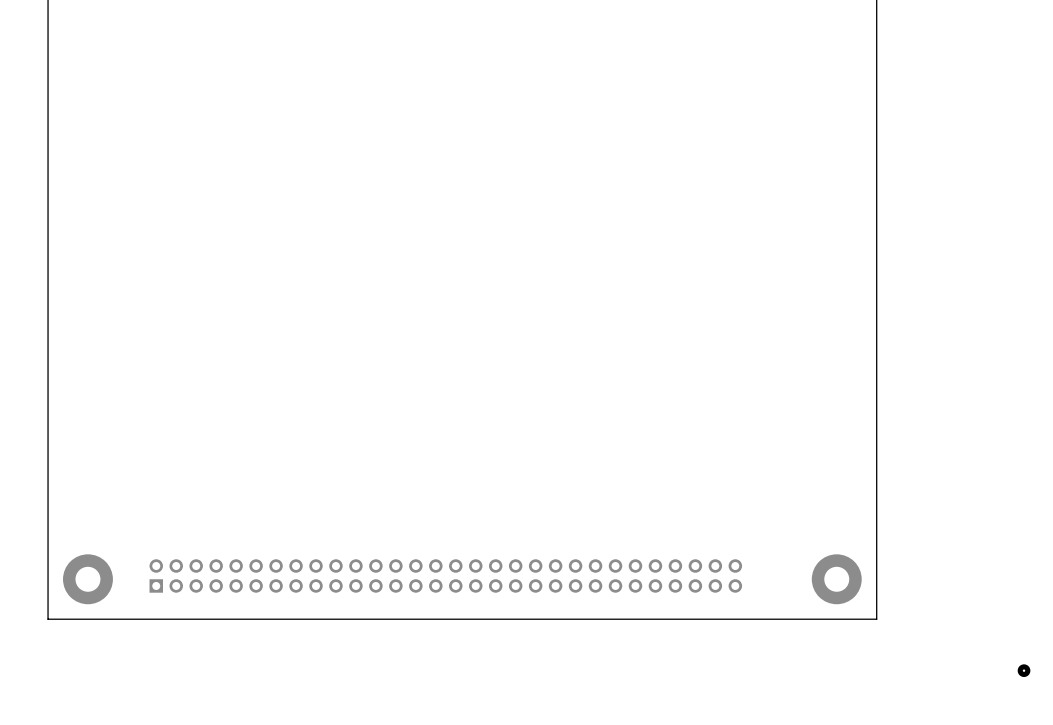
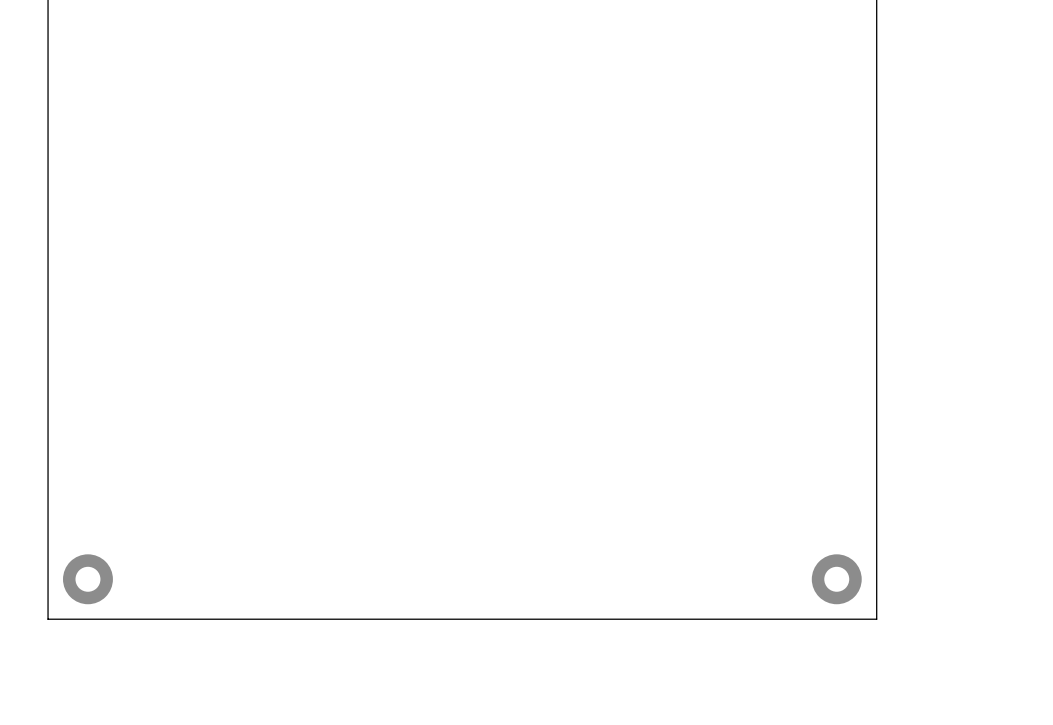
part: (445, 575) -> none
part: (1024, 670) -> none

